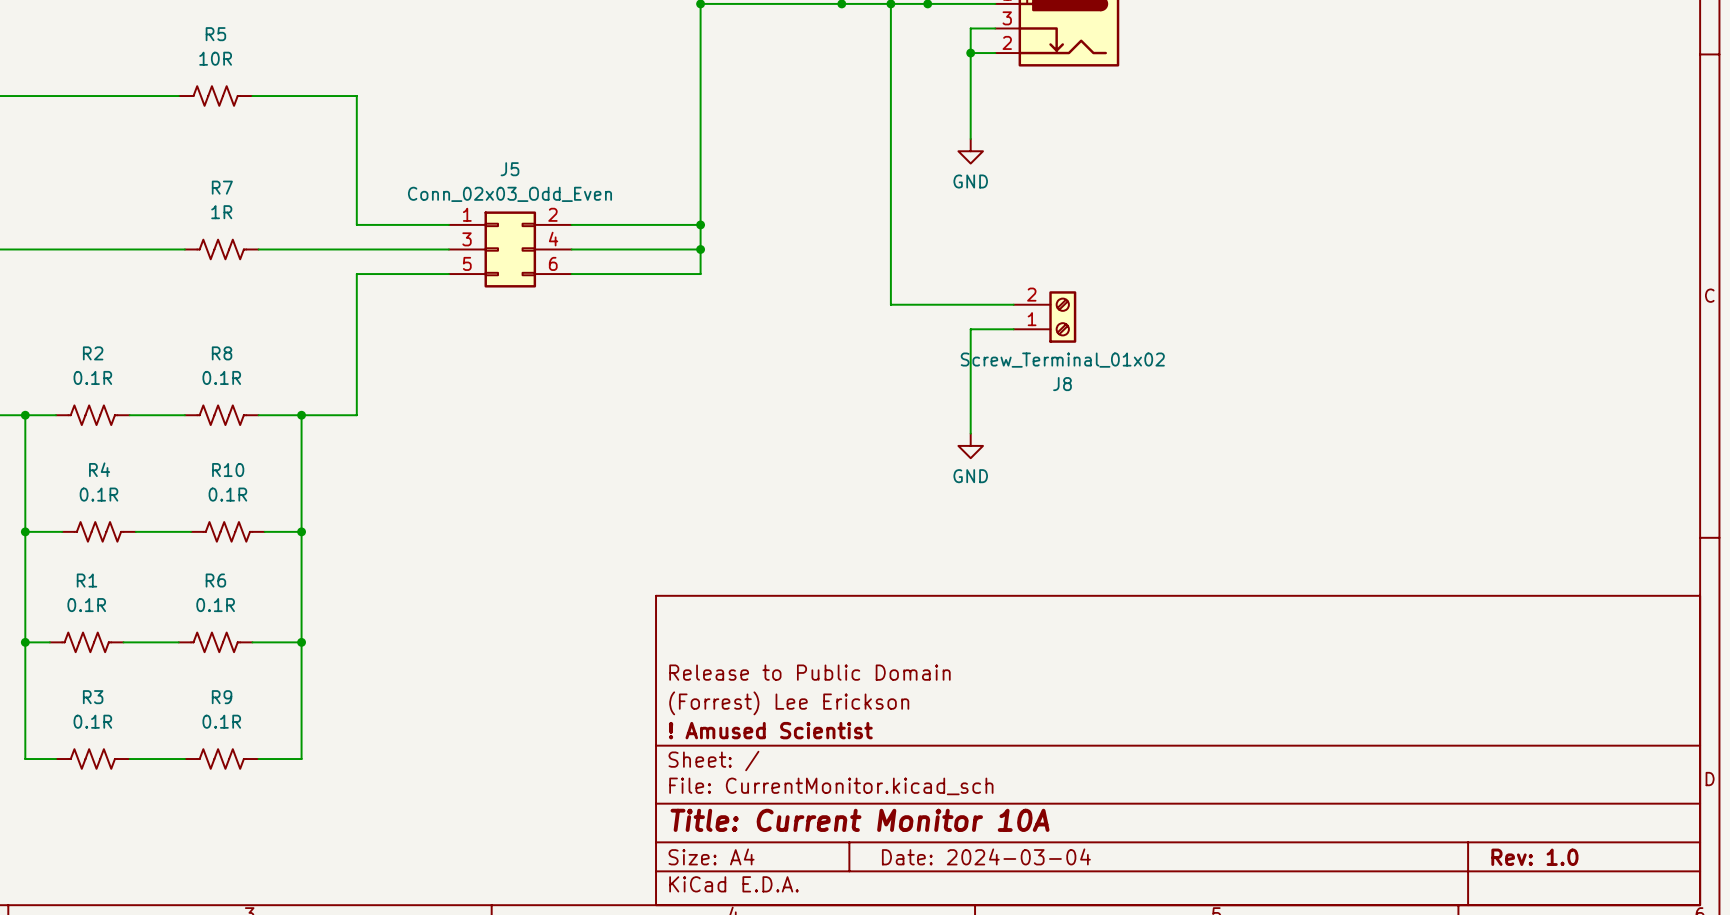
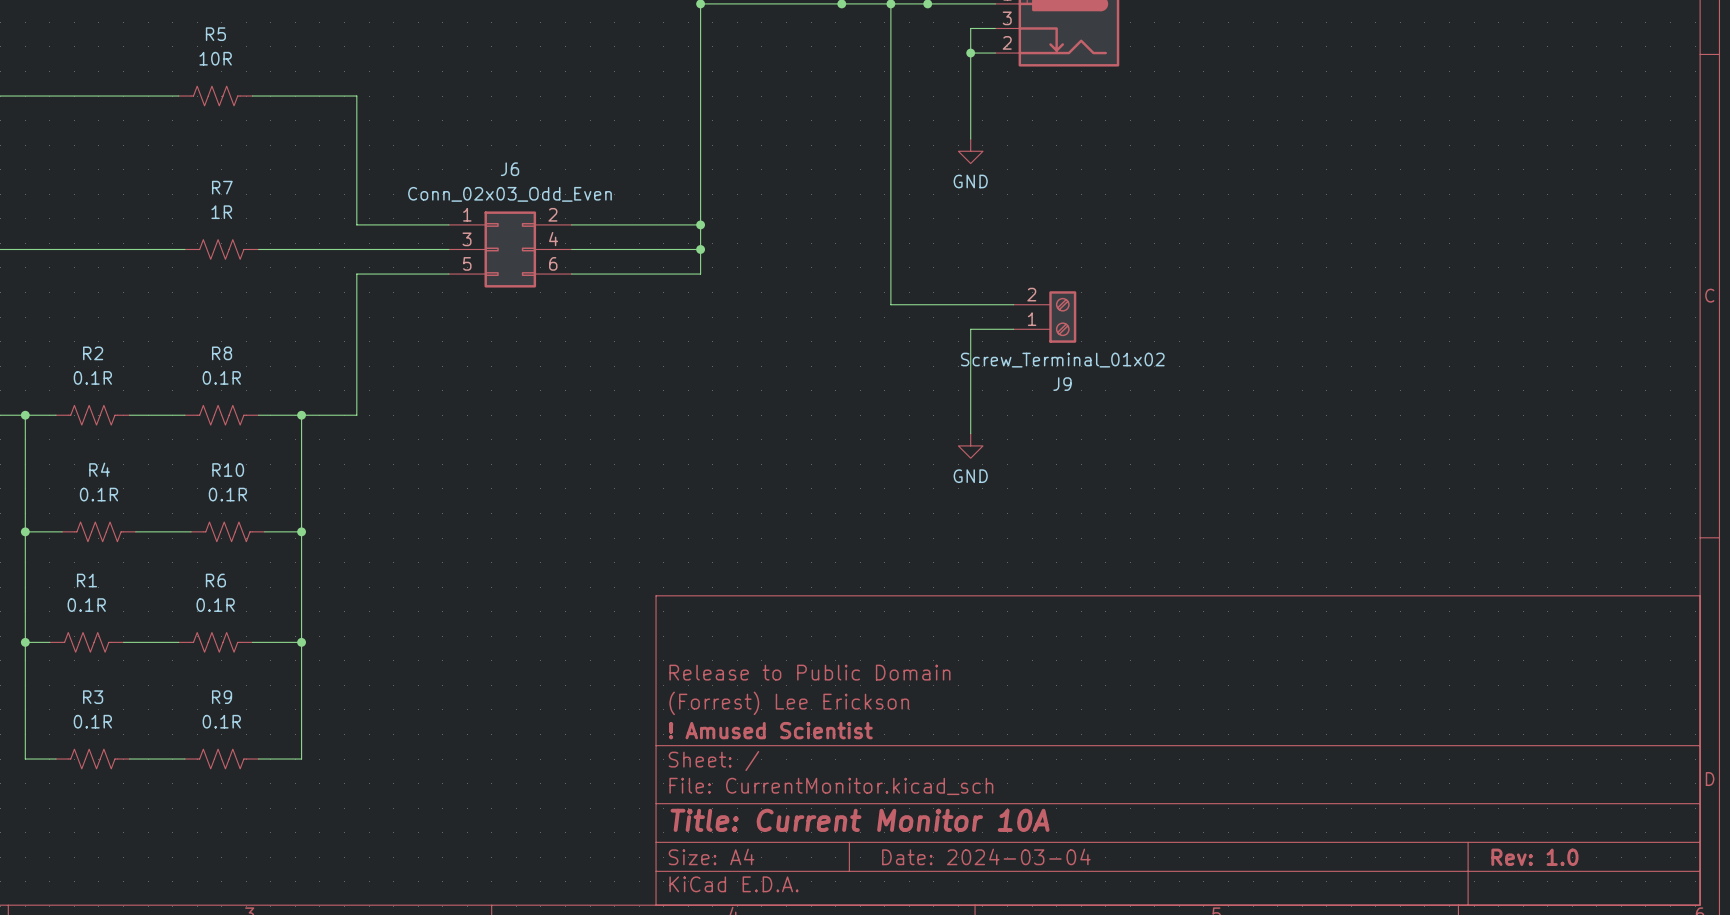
J5 name: J5 (509, 169) -> J6 (509, 169)
J8 name: J8 (1062, 384) -> J9 (1062, 384)

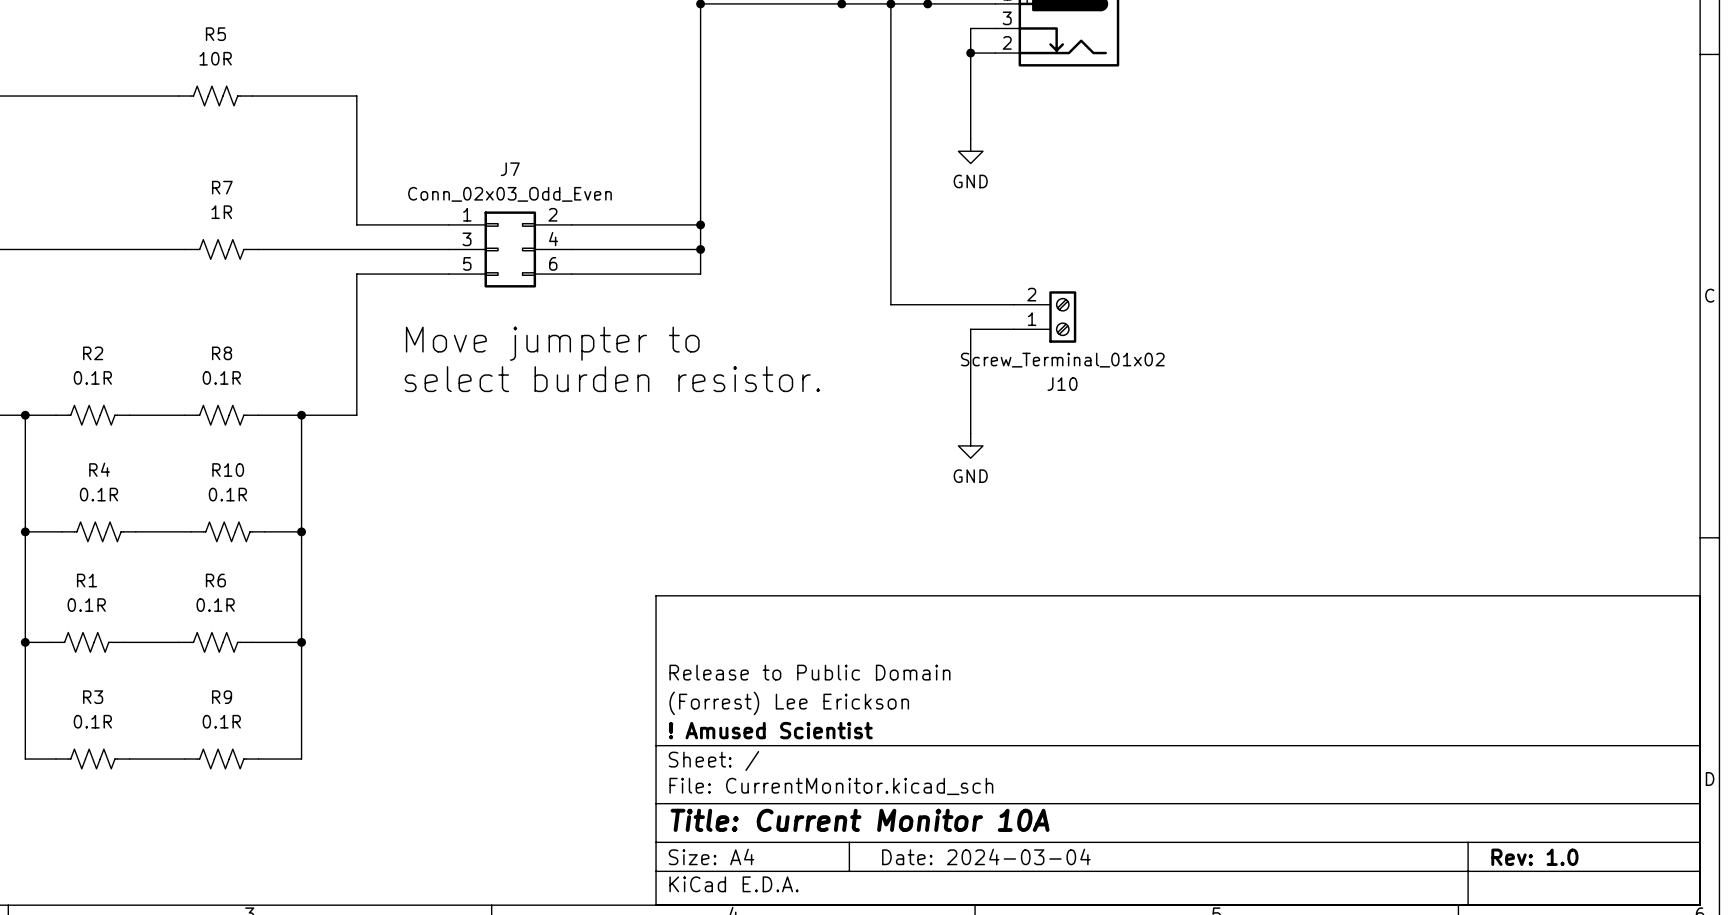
J6 name: J6 (509, 169) -> J7 (510, 169)
text: none -> Move jumpter to (552, 343)
text: none -> select burden resistor. (612, 379)
J9 name: J9 (1062, 384) -> J10 (1062, 384)

